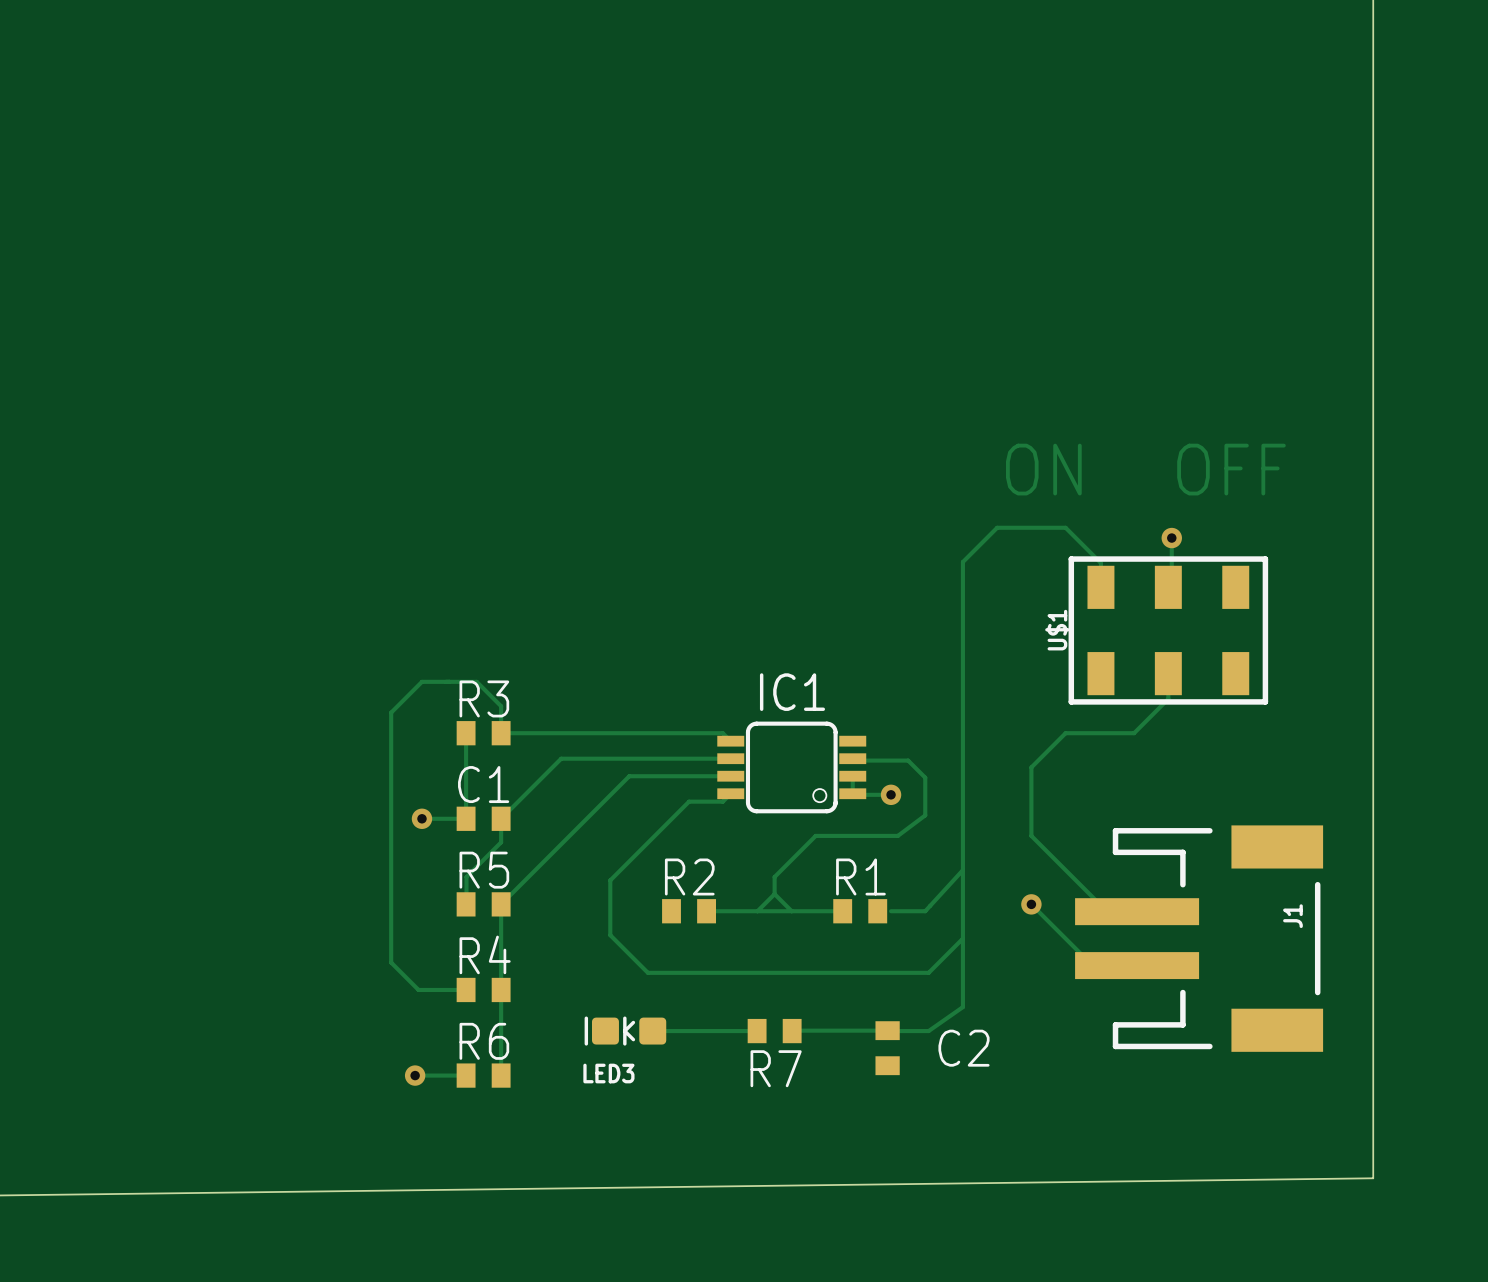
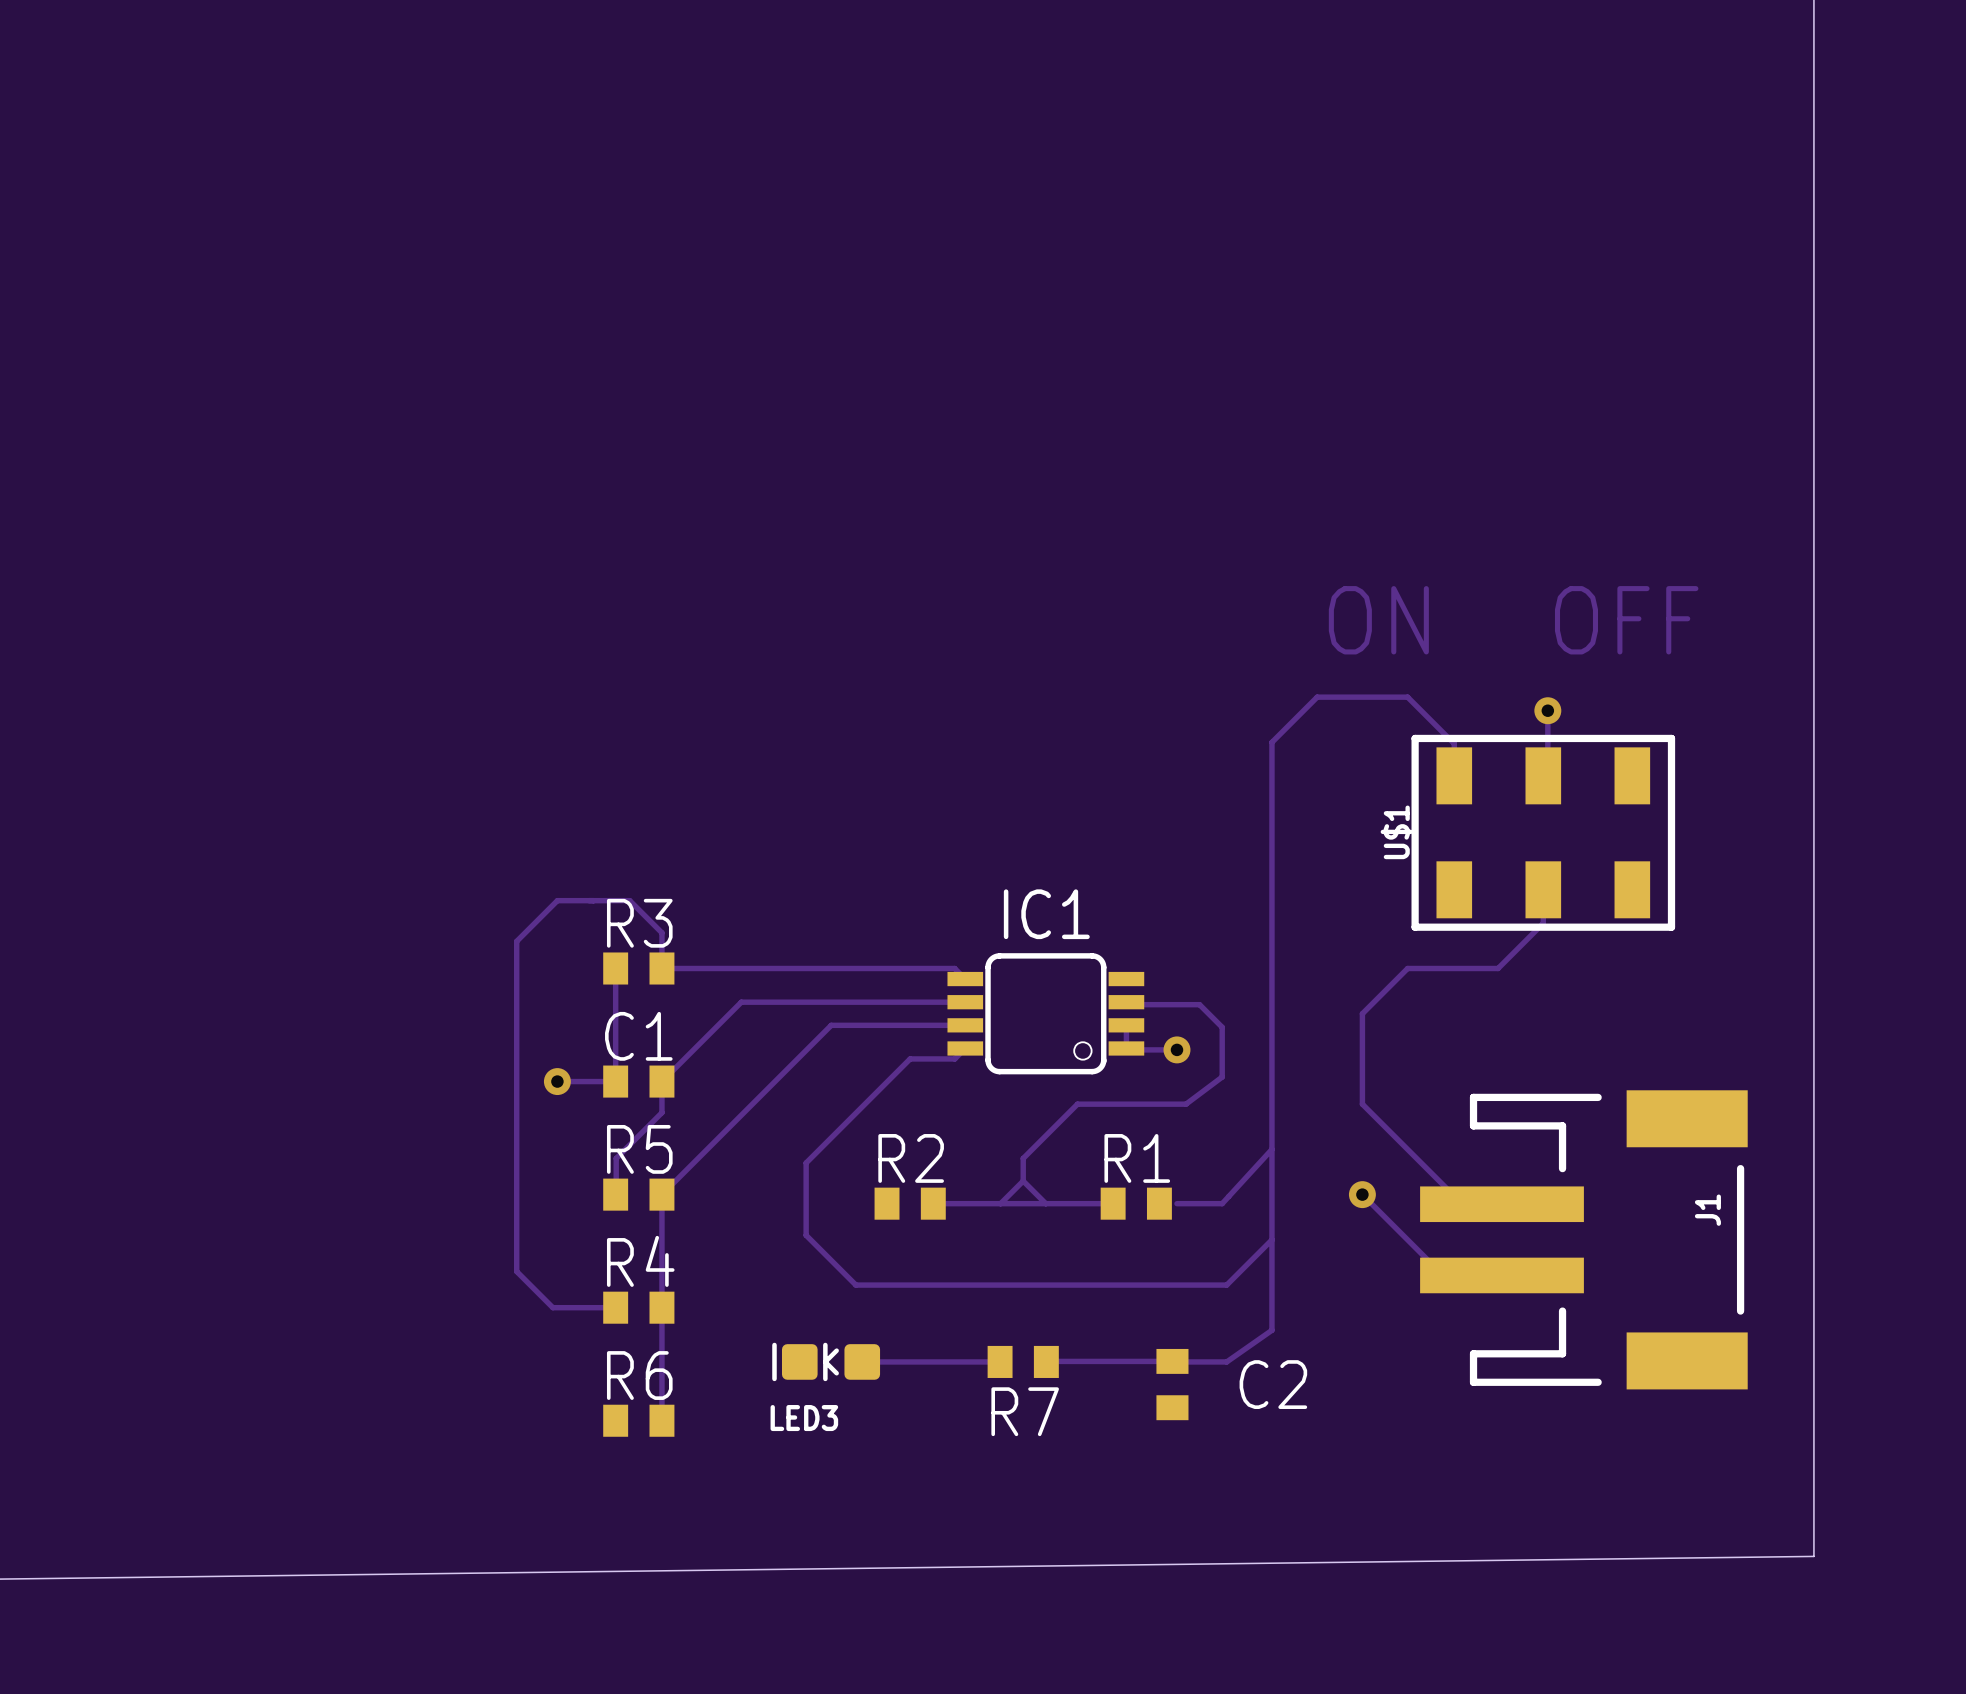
track: (415, 1075) (466, 1075) -> none
via: (415, 1075) -> none

